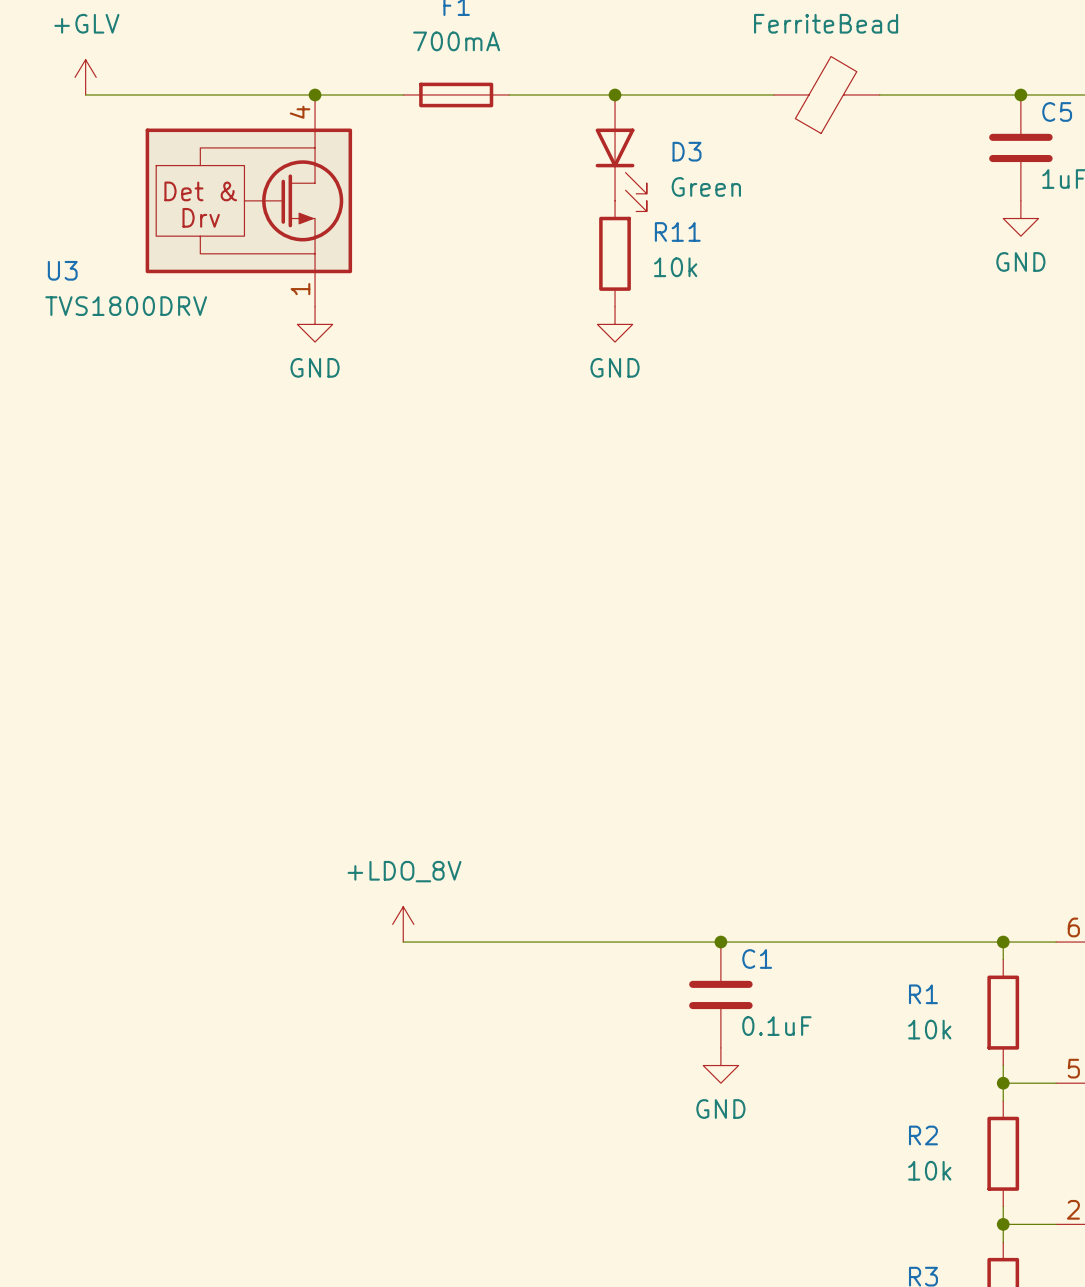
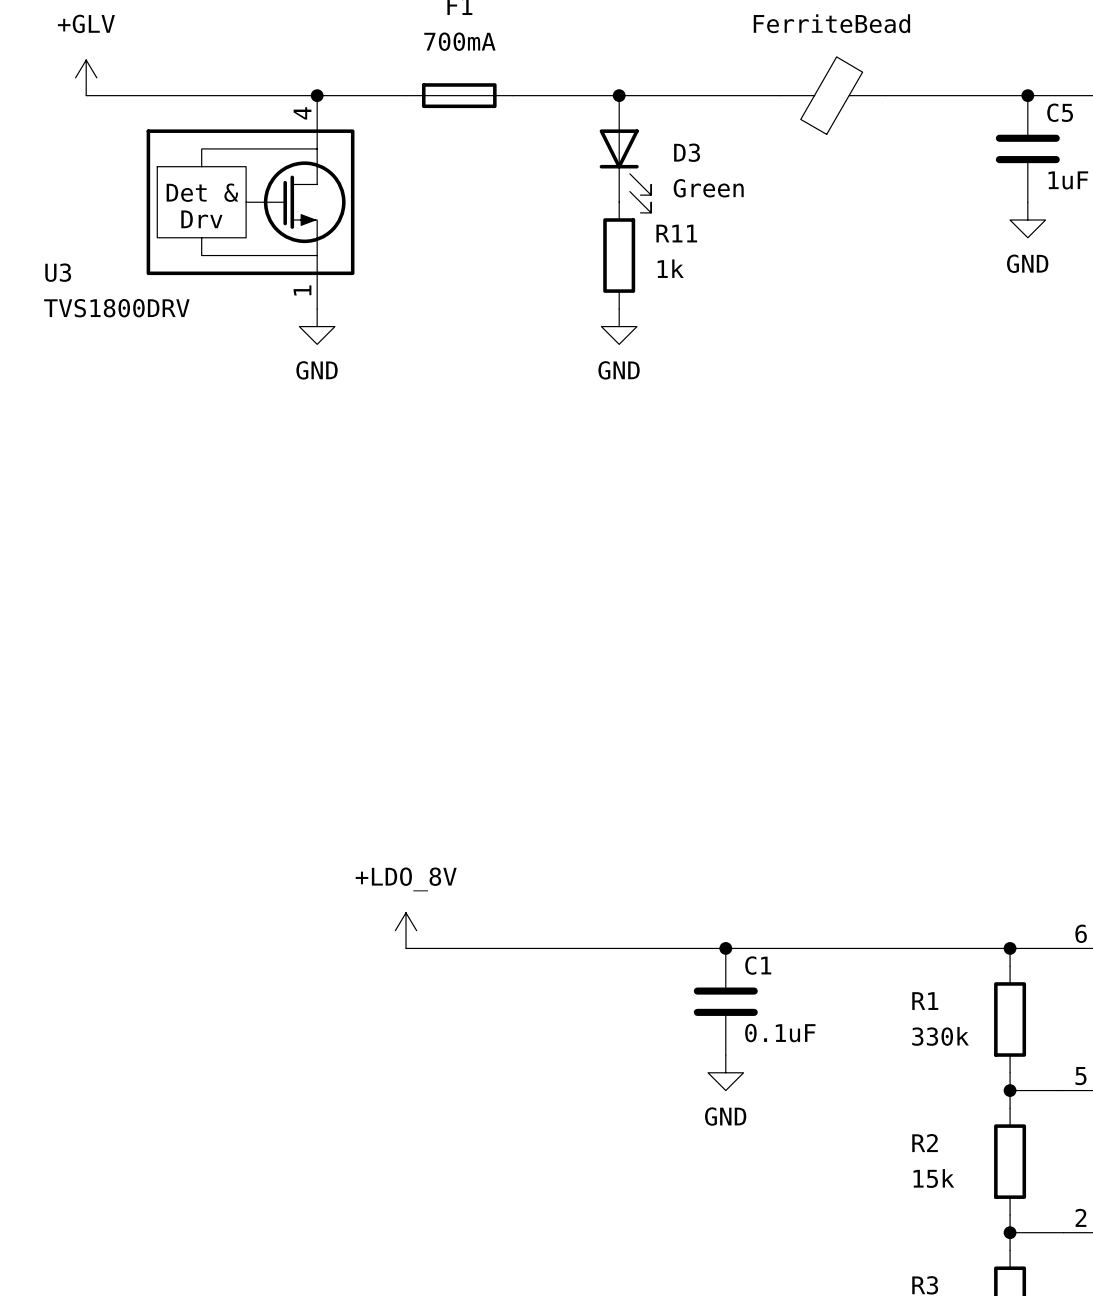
R11 value: 10k (675, 267) -> 1k (670, 268)
R1 value: 10k (929, 1029) -> 330k (940, 1036)
R2 value: 10k (929, 1170) -> 15k (933, 1178)

